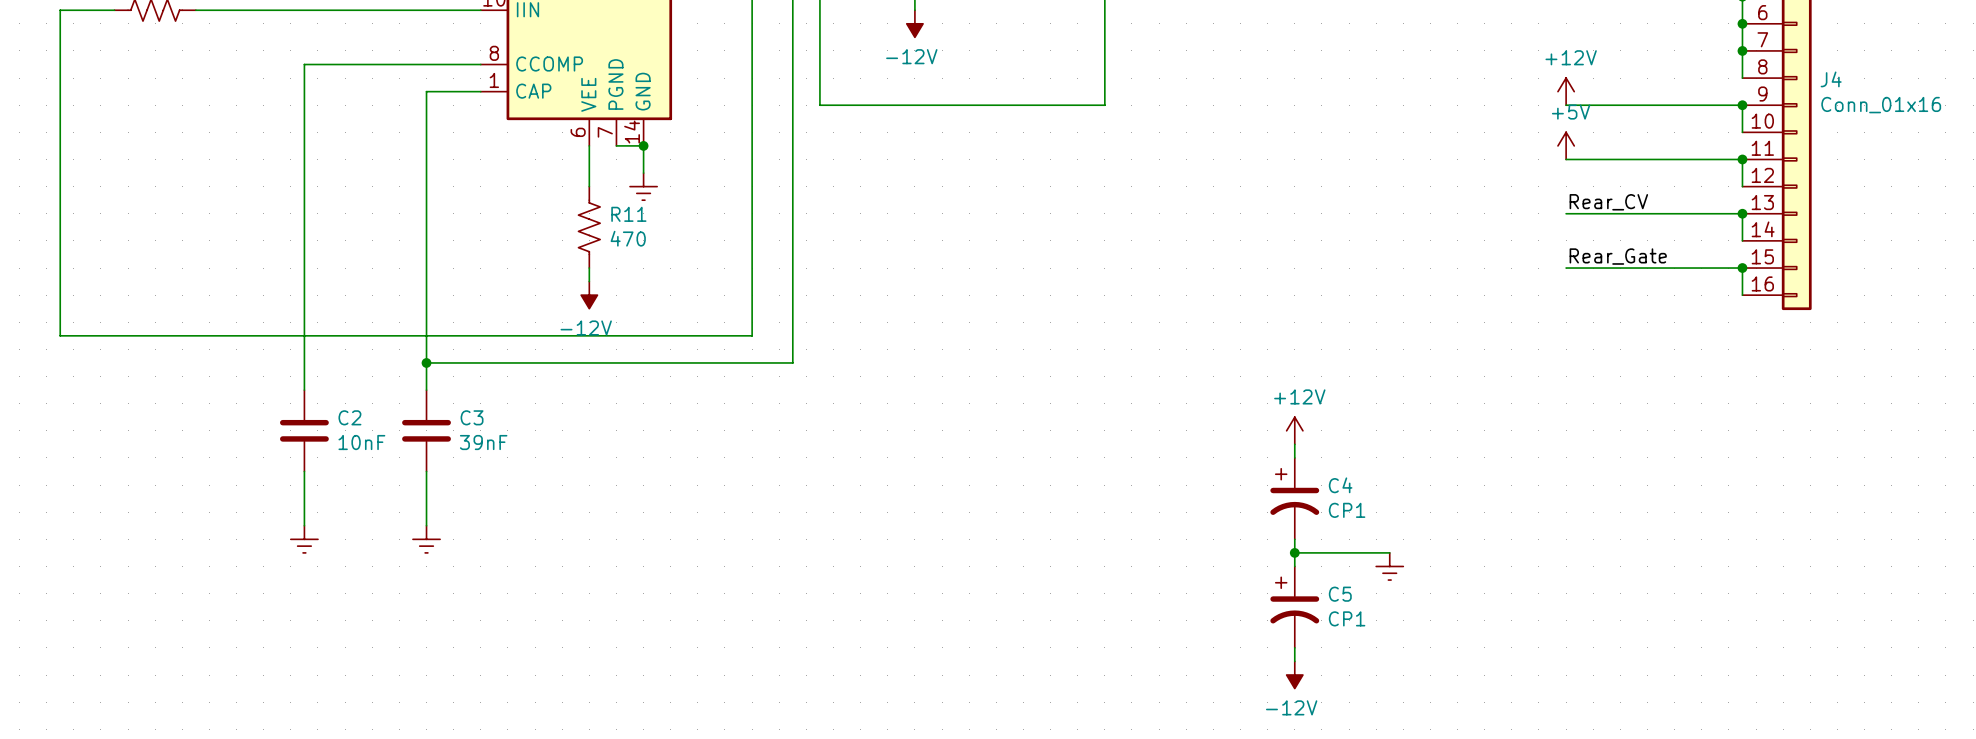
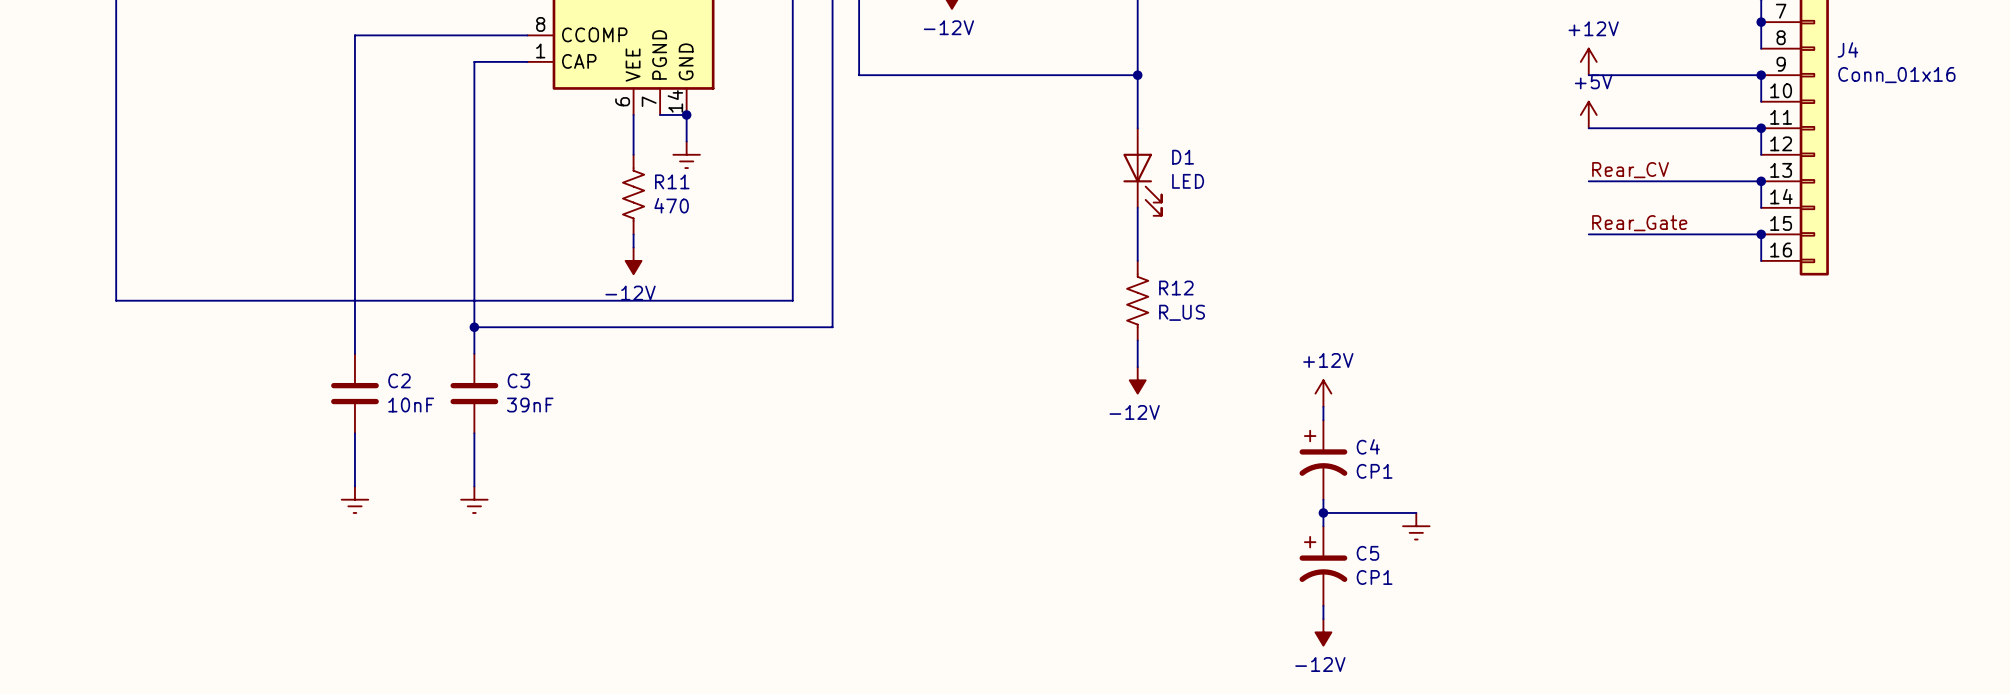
wire: none -> (1137, 75) (1137, 128)
junction: none -> (1137, 75)
D1: none -> LED (1142, 172)
wire: none -> (1137, 207) (1137, 260)
R12: none -> R_US (1137, 300)
wire: none -> (1137, 340) (1137, 367)
power symbol: none -> -12V (1137, 380)

